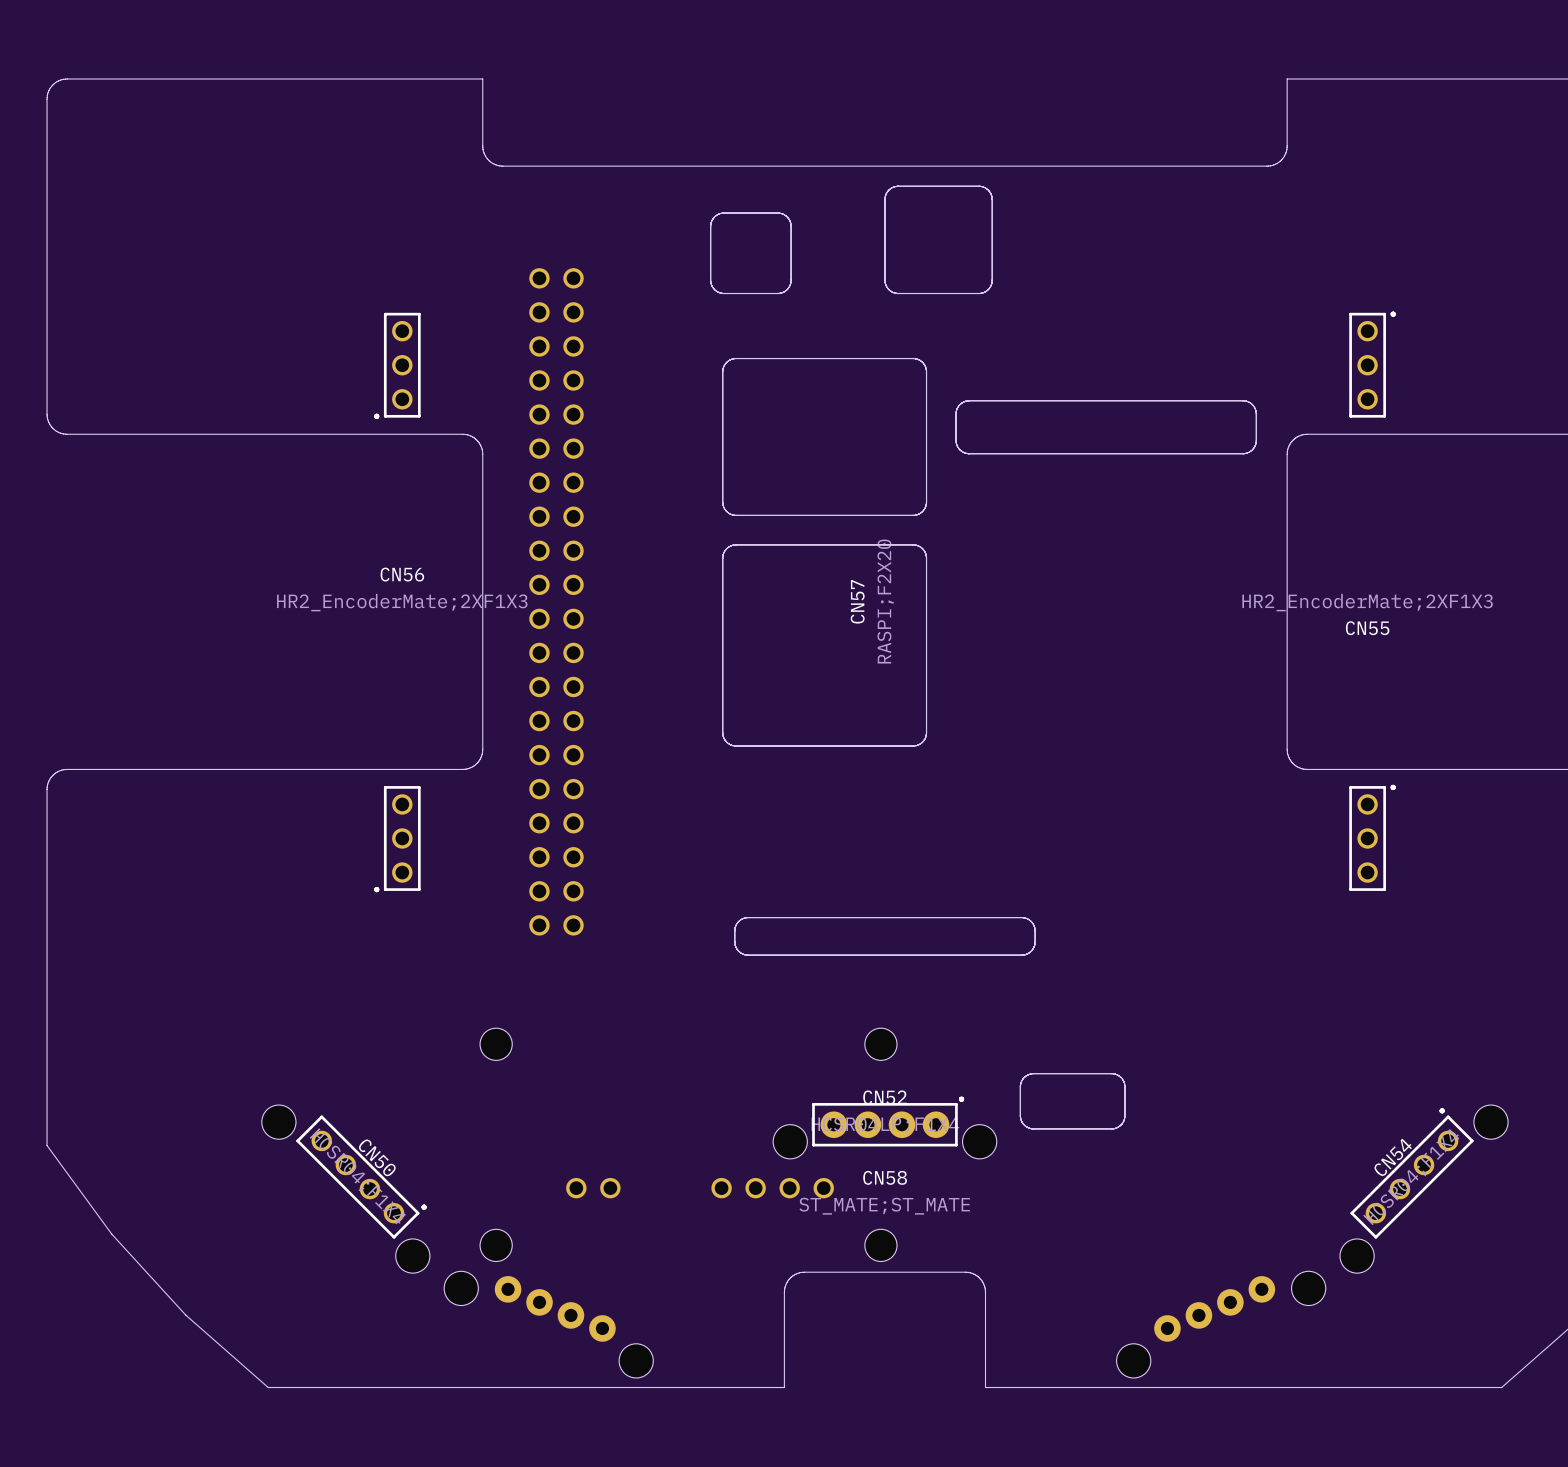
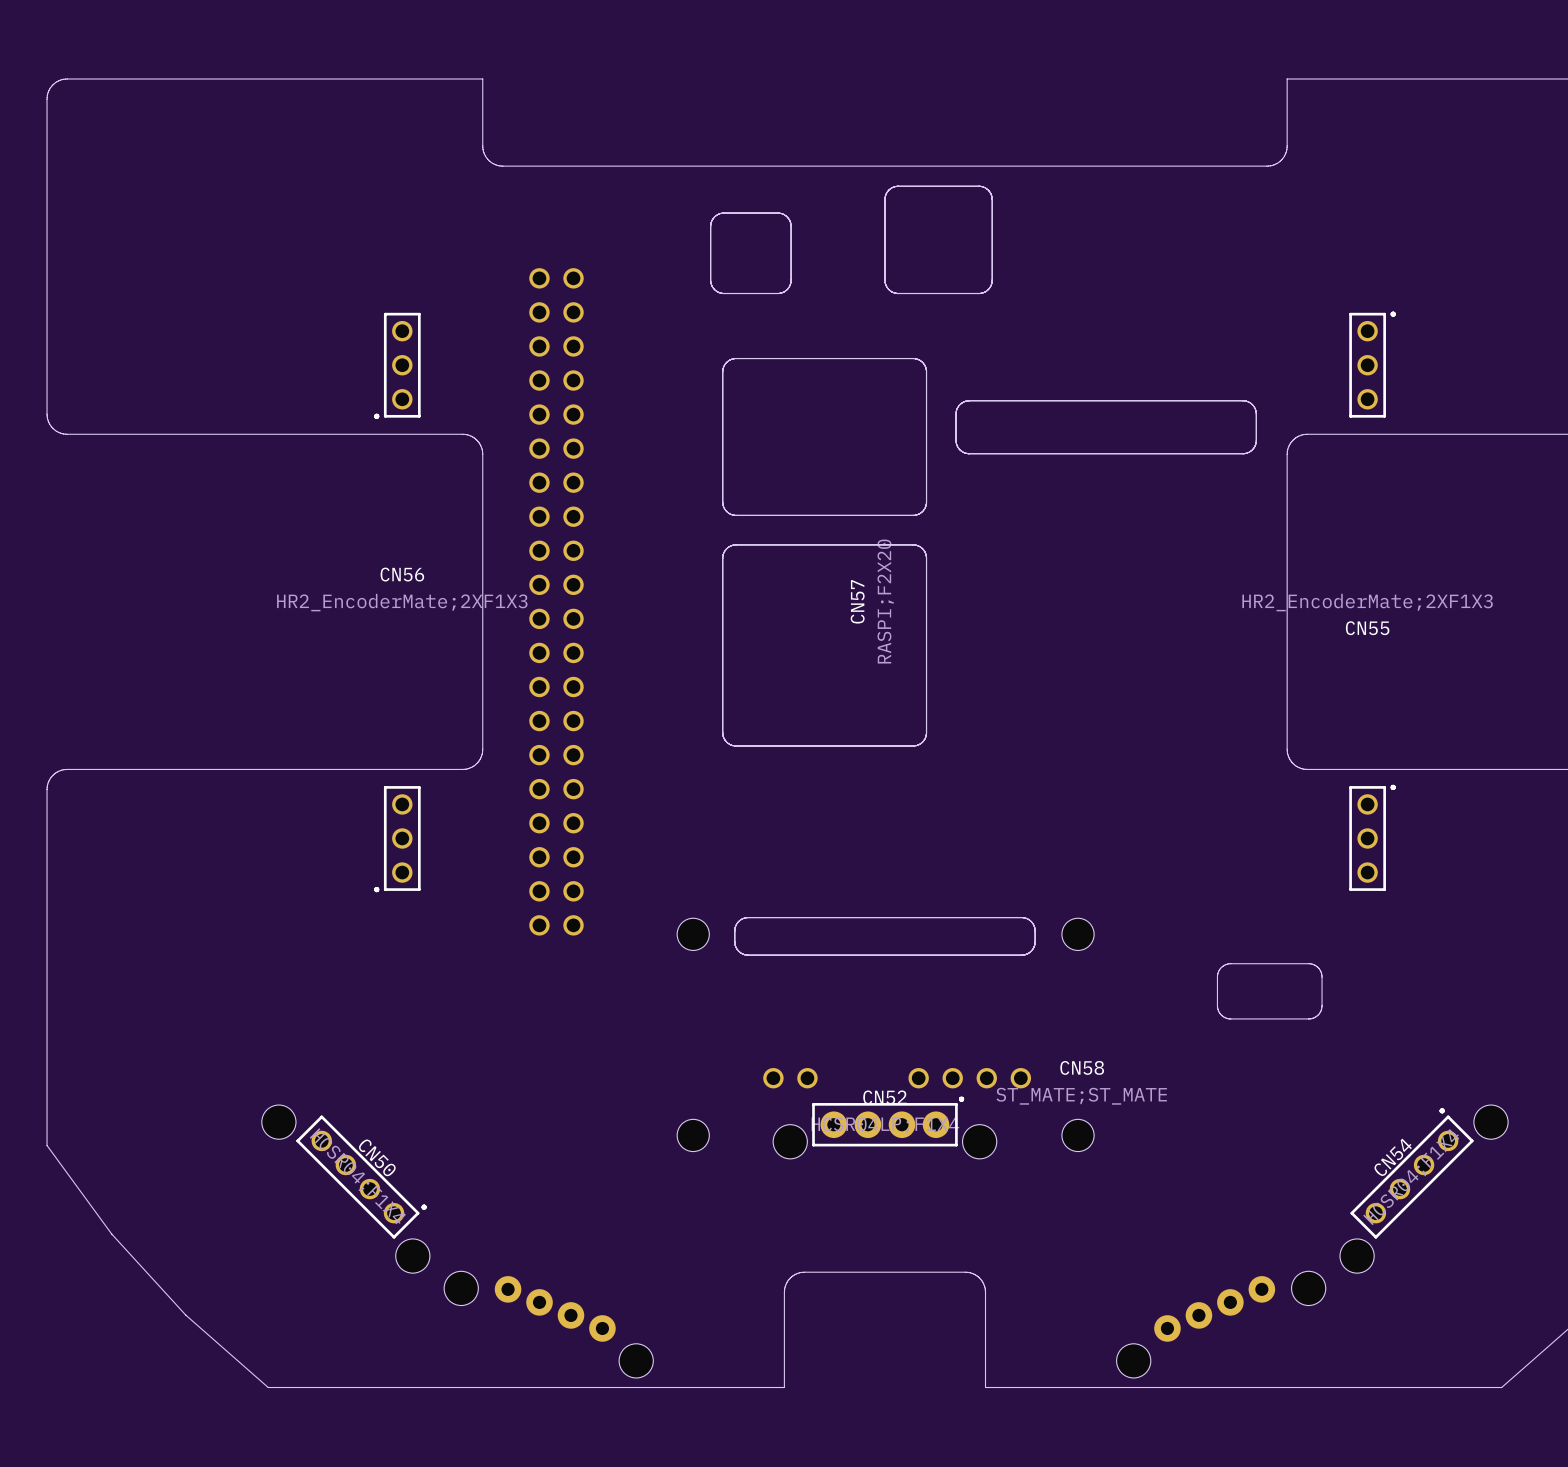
board edge: (1032, 1073) (1112, 1073) (1118, 1075) (1122, 1079) (1124, 1085) (1123, 1121) (1118, 1127) (1112, 1128) (1032, 1128) (1027, 1127) (1022, 1123) (1020, 1116) (1020, 1085) (1024, 1077) (1032, 1073) -> none
CN58 position: (802, 1144) -> (999, 1034)

